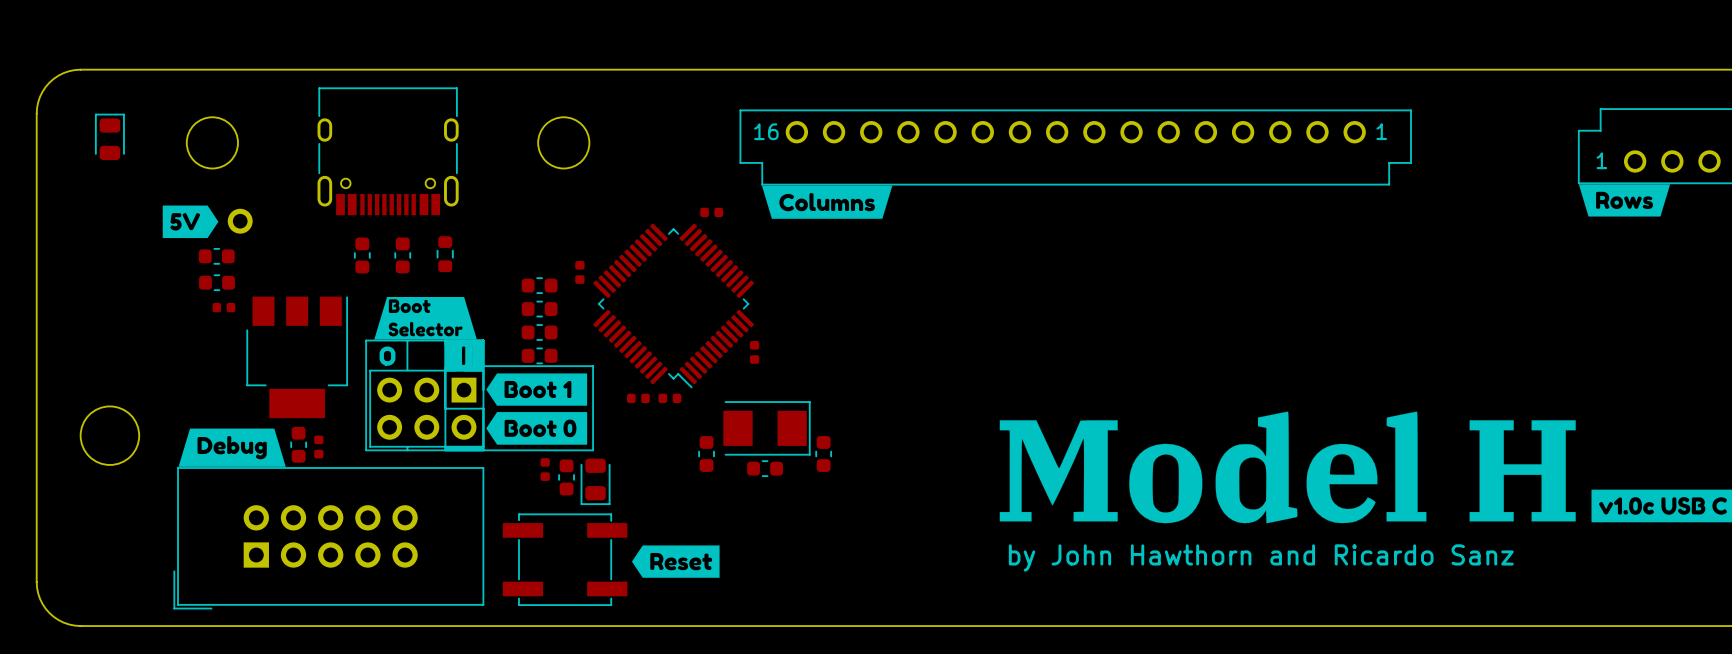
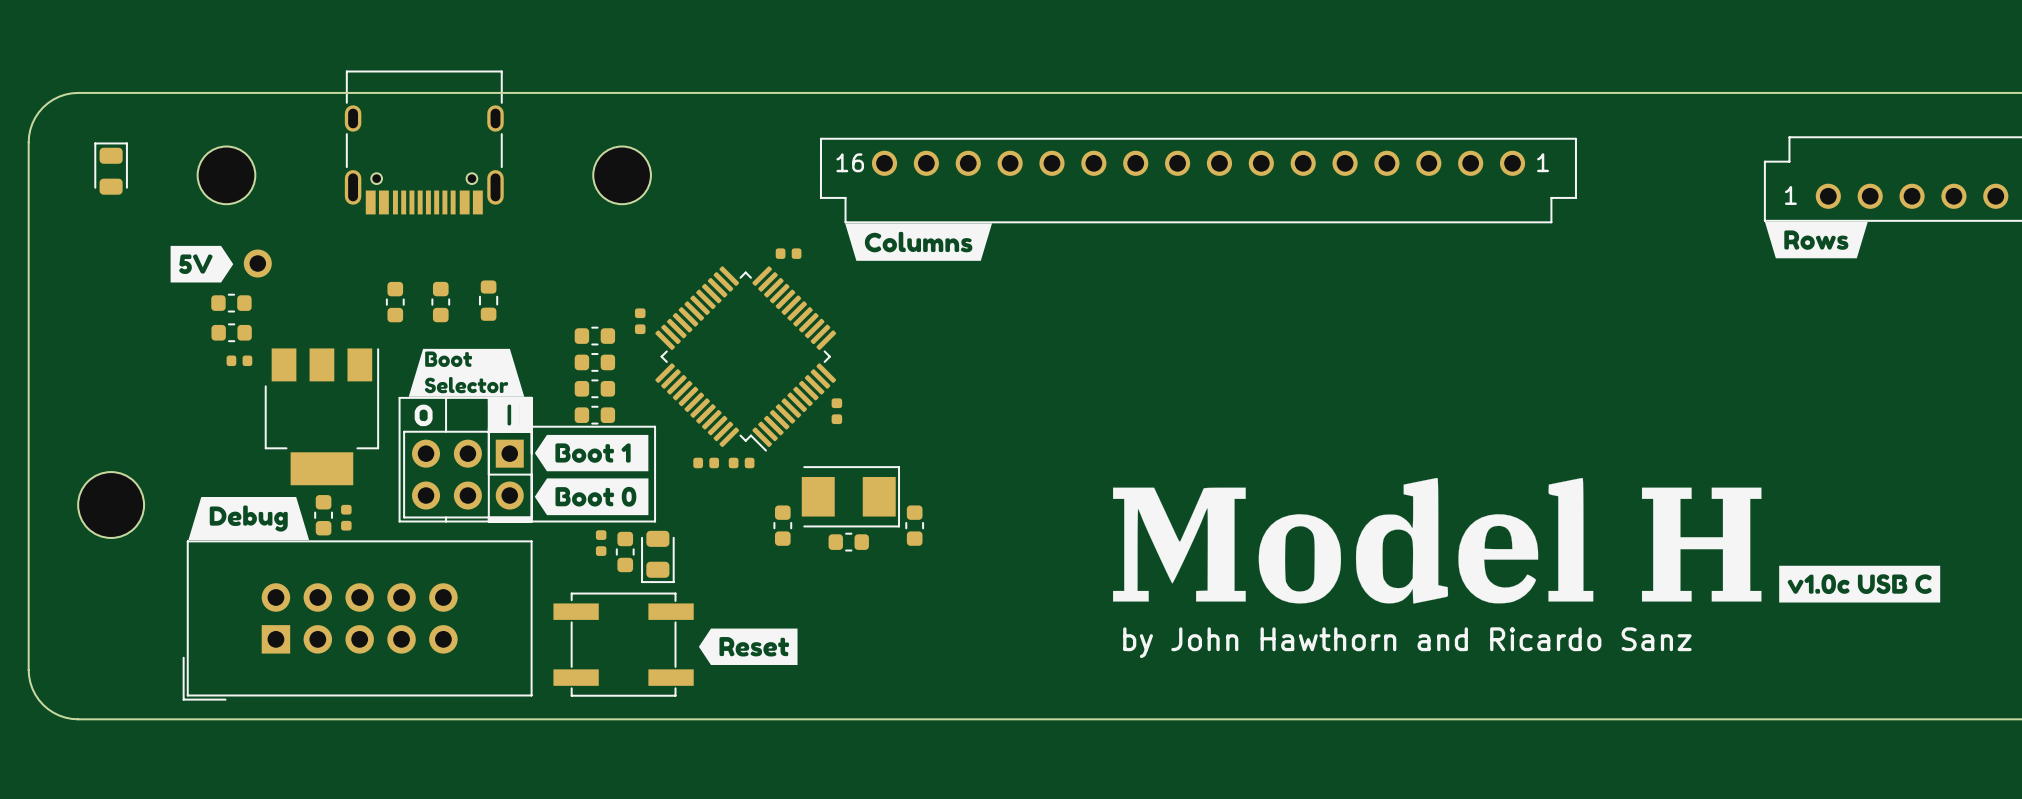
part position: (388, 151) -> (424, 142)

